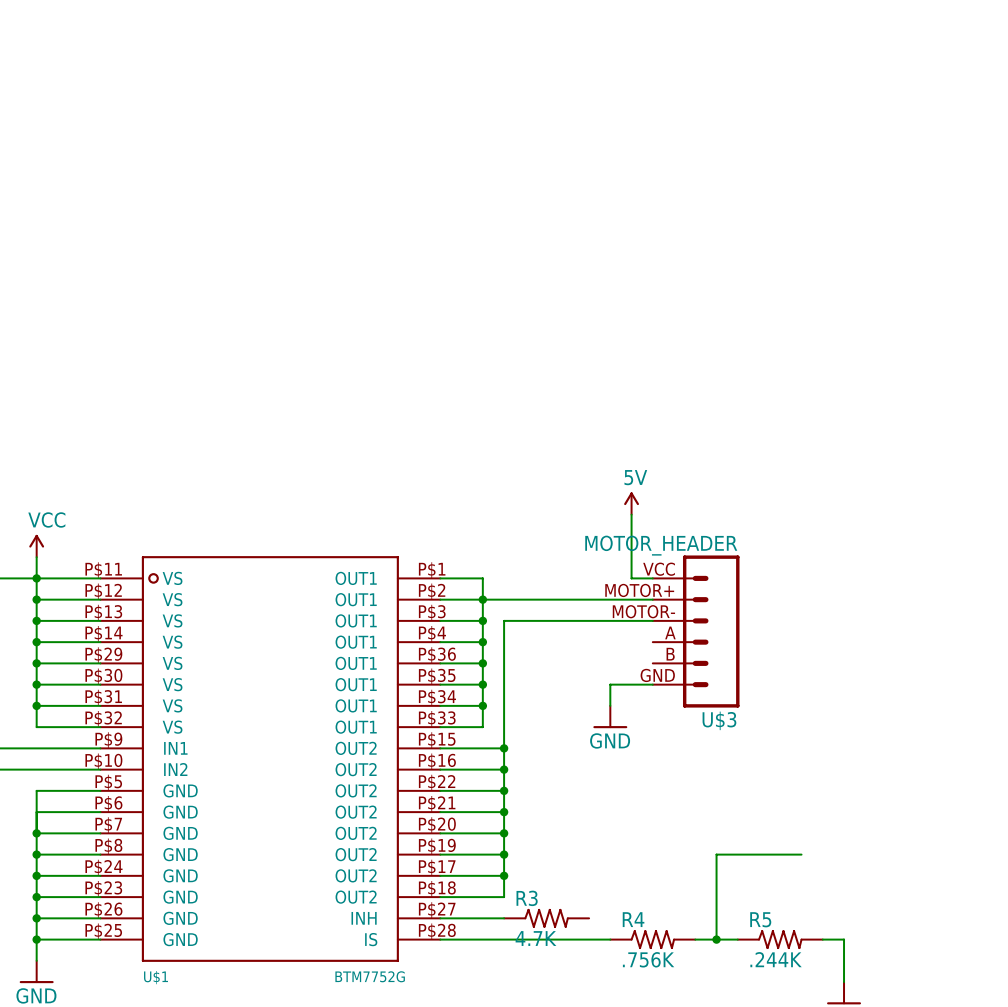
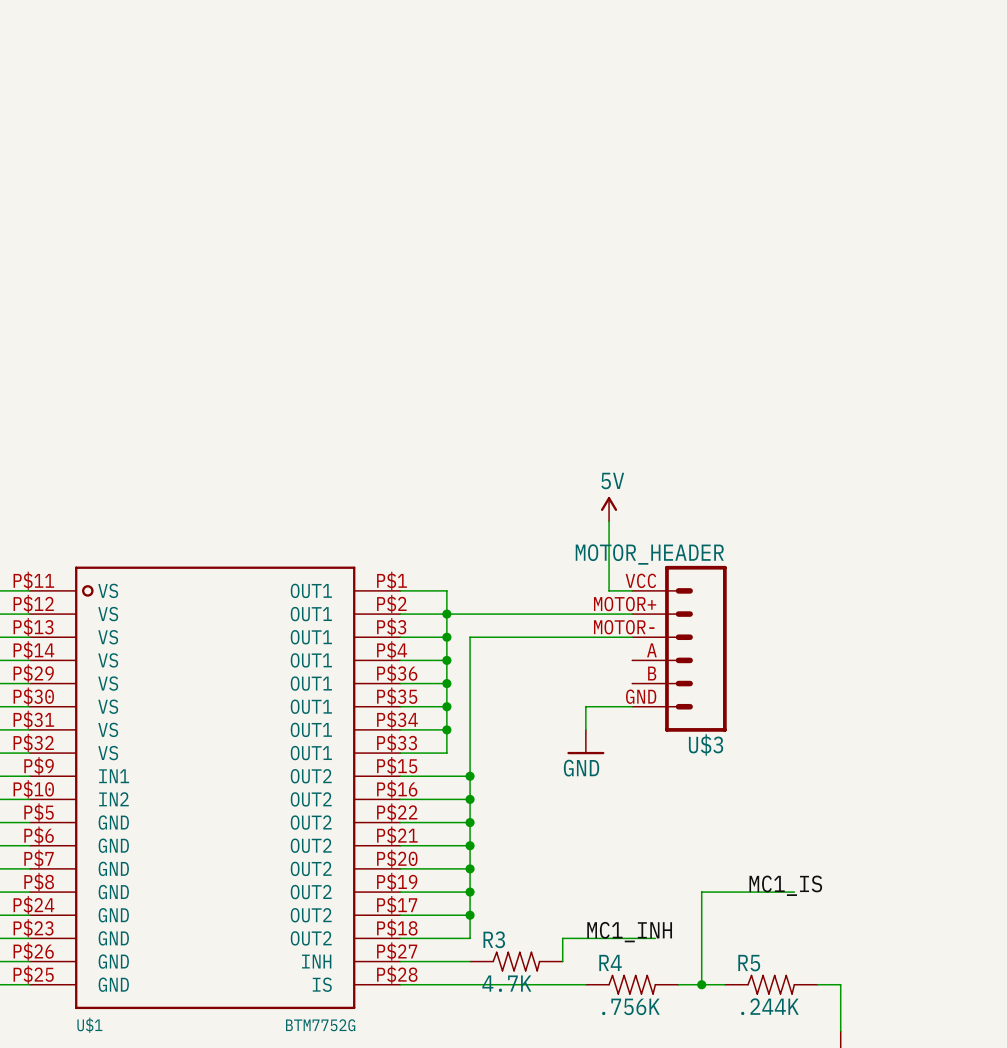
label: none -> MC1_IS (785, 885)
label: none -> MC1_INH (629, 932)
wire: none -> (655, 938) (562, 938) (562, 961)

